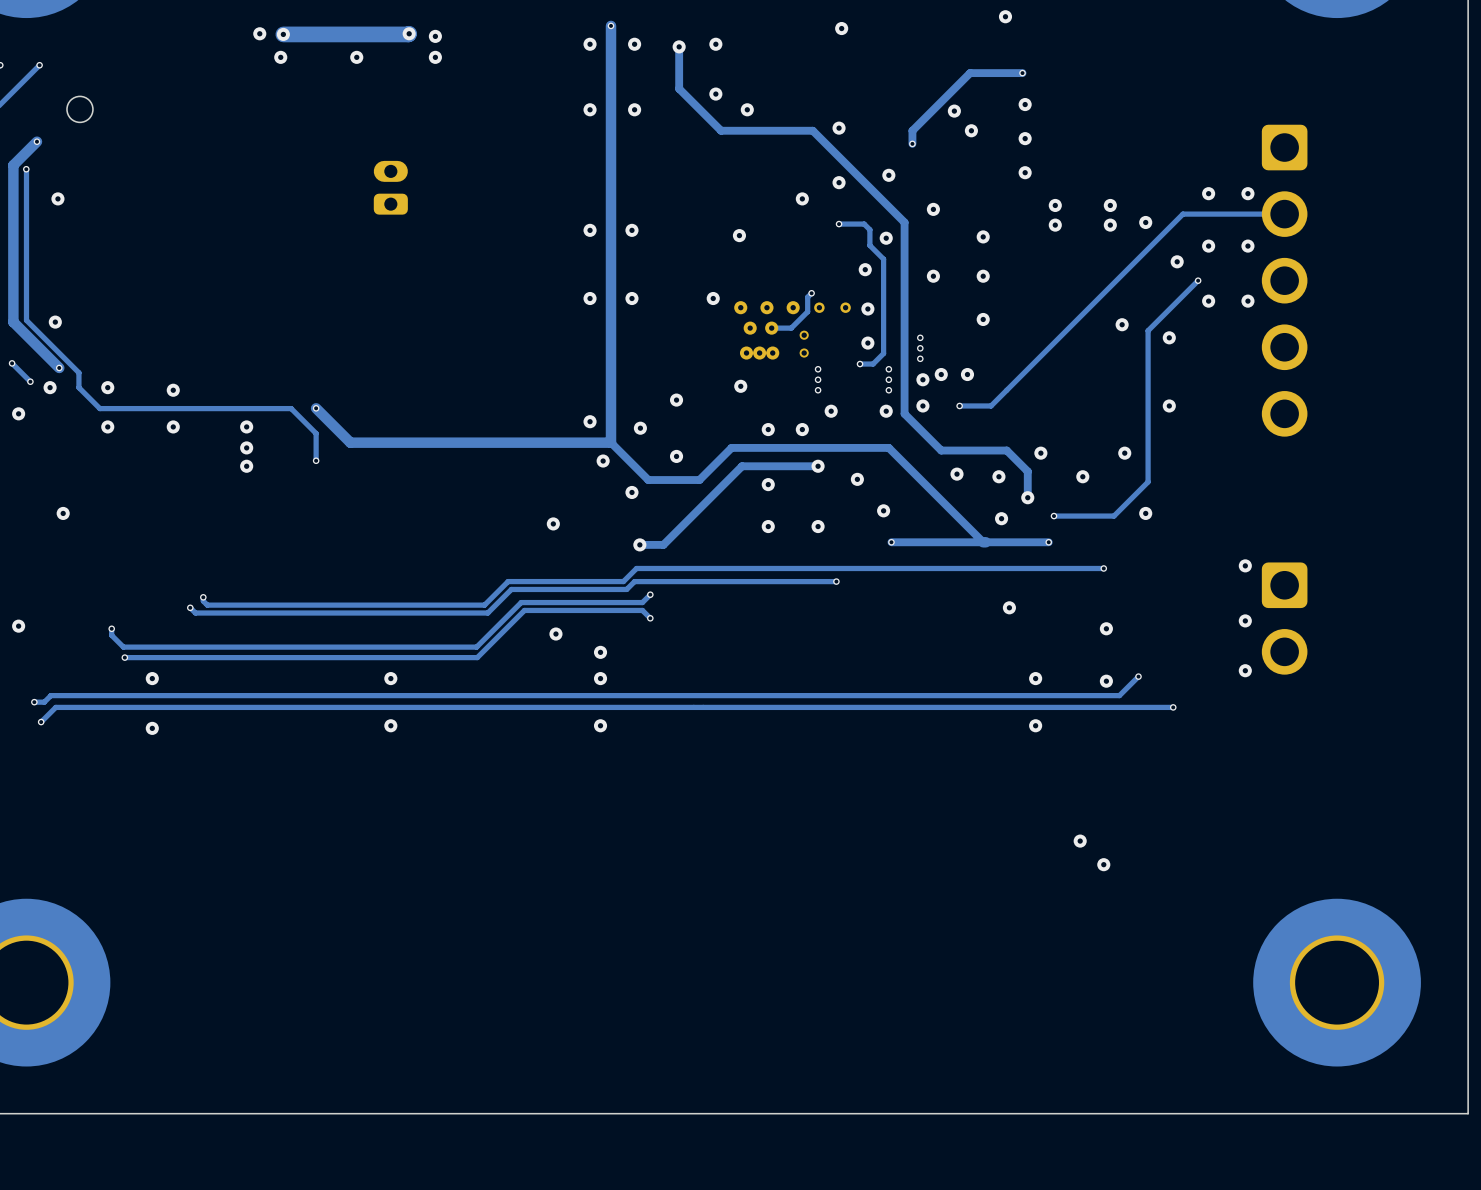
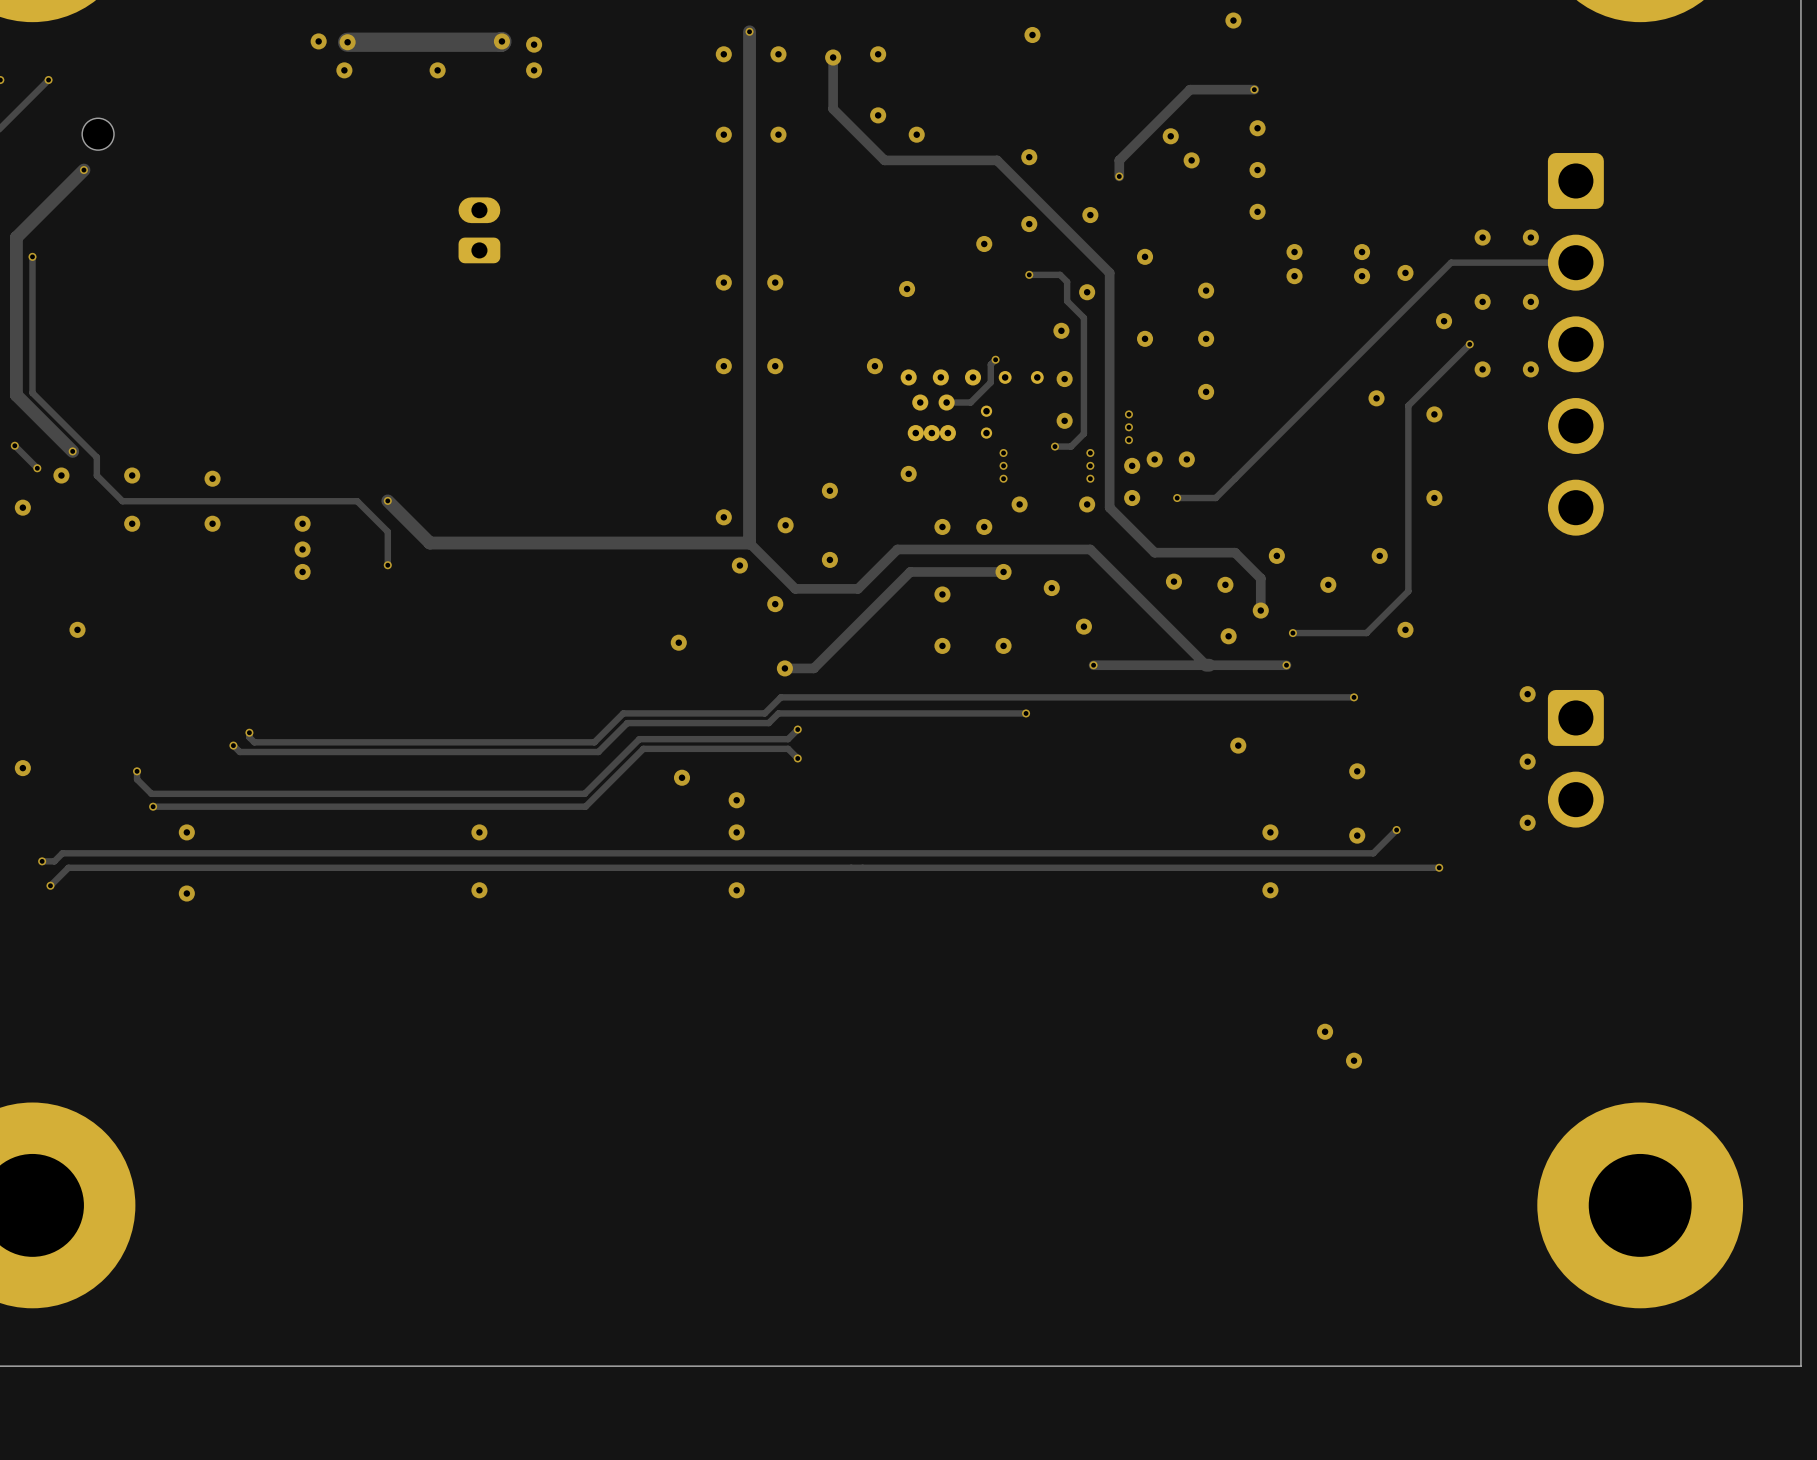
via: none -> (83, 170)
track: (36, 141) (13, 165) (13, 193) -> (83, 170) (16, 237)
via: (36, 141) -> none
track: (26, 169) (26, 209) -> none
via: (26, 169) -> none
via: (57, 198) -> none
via: none -> (32, 256)
via: (55, 322) -> none

